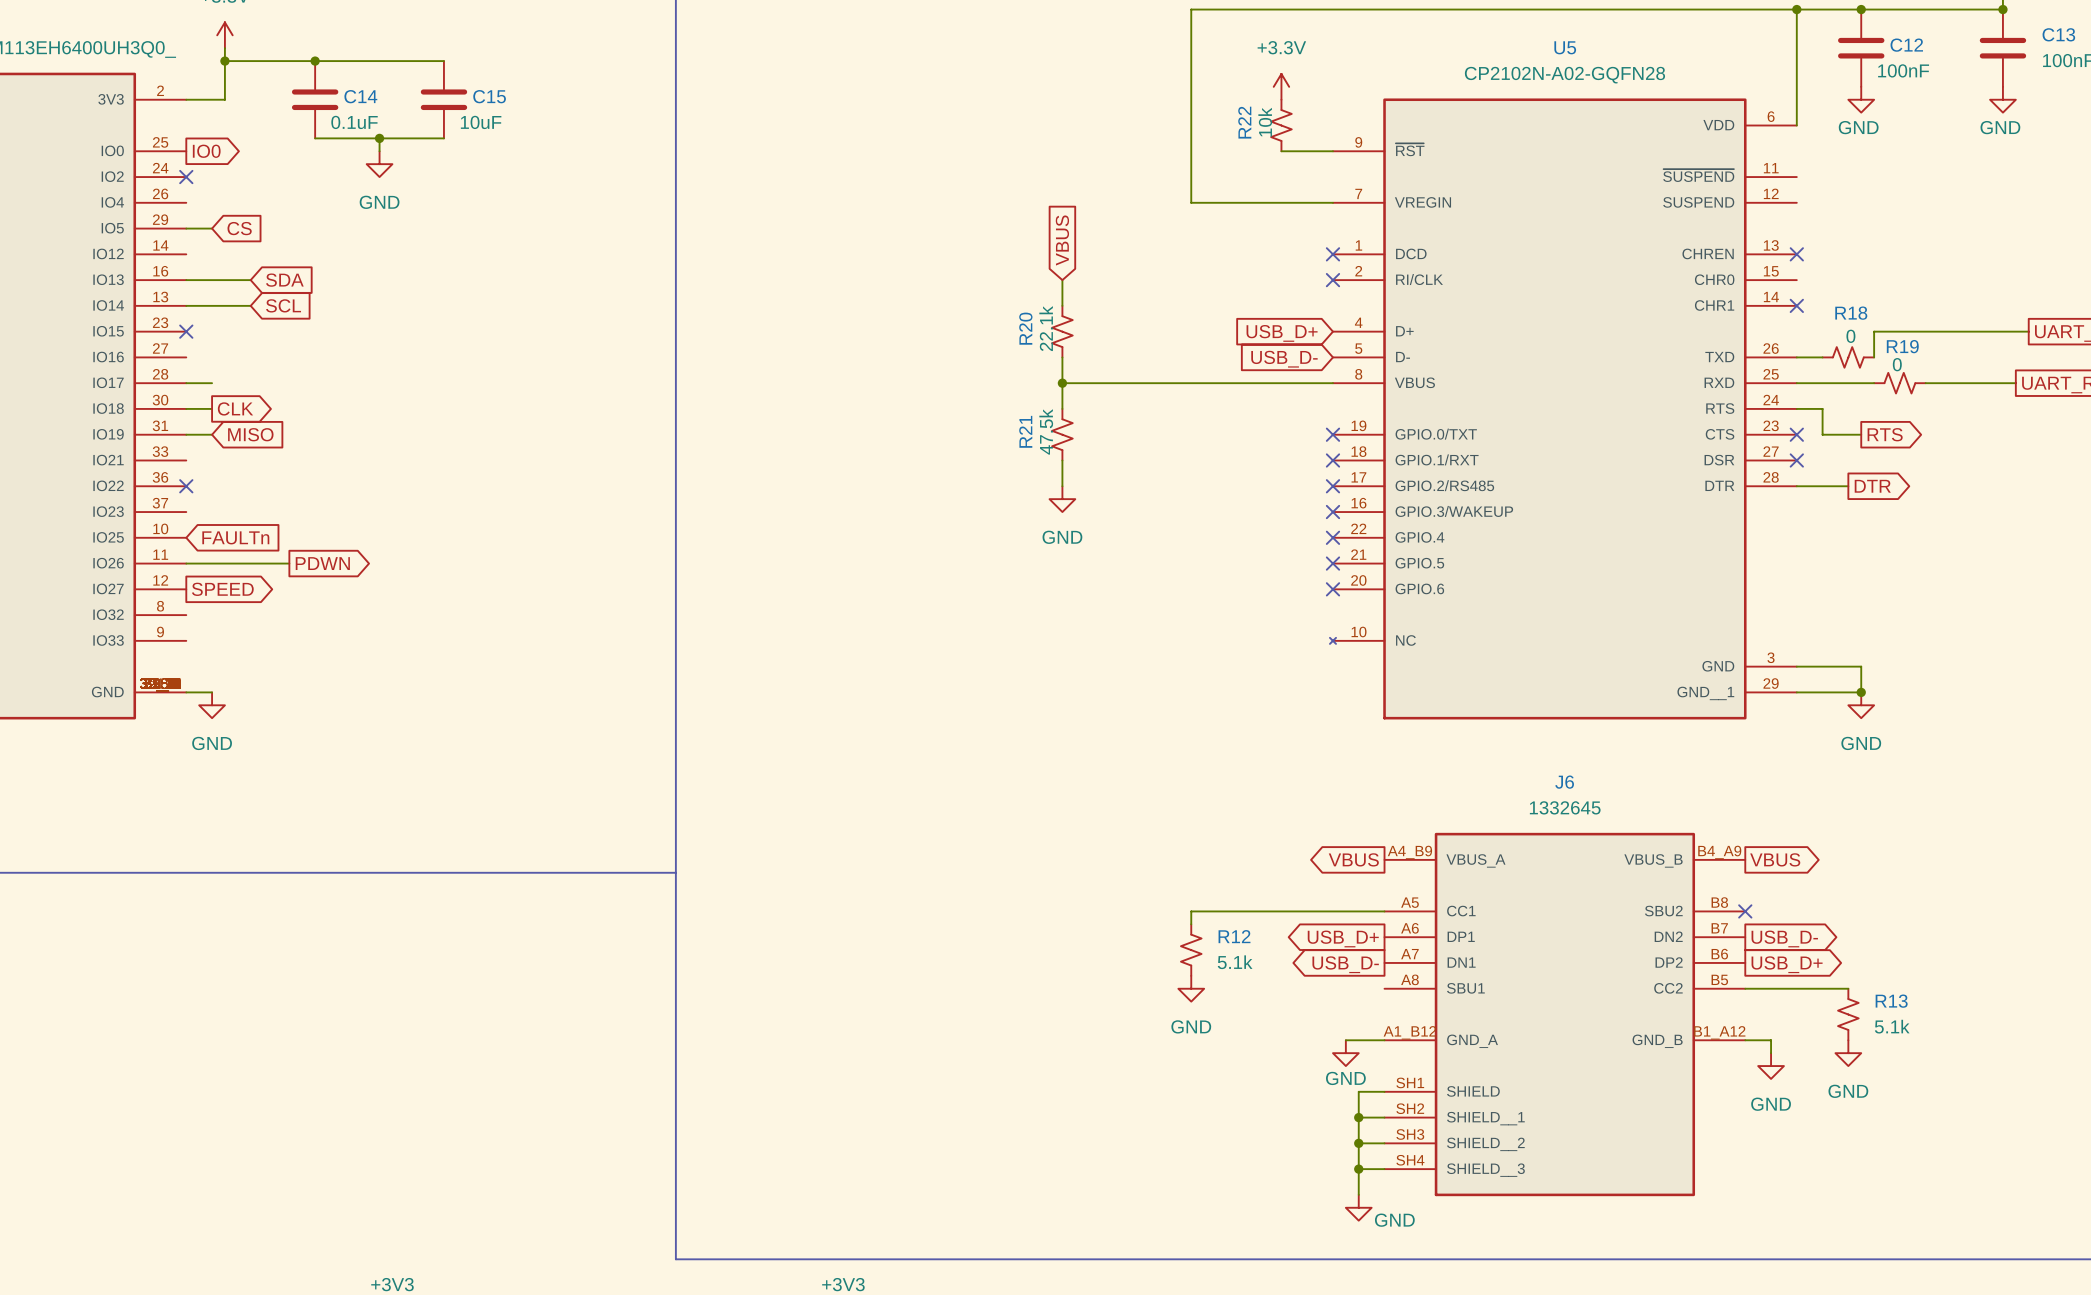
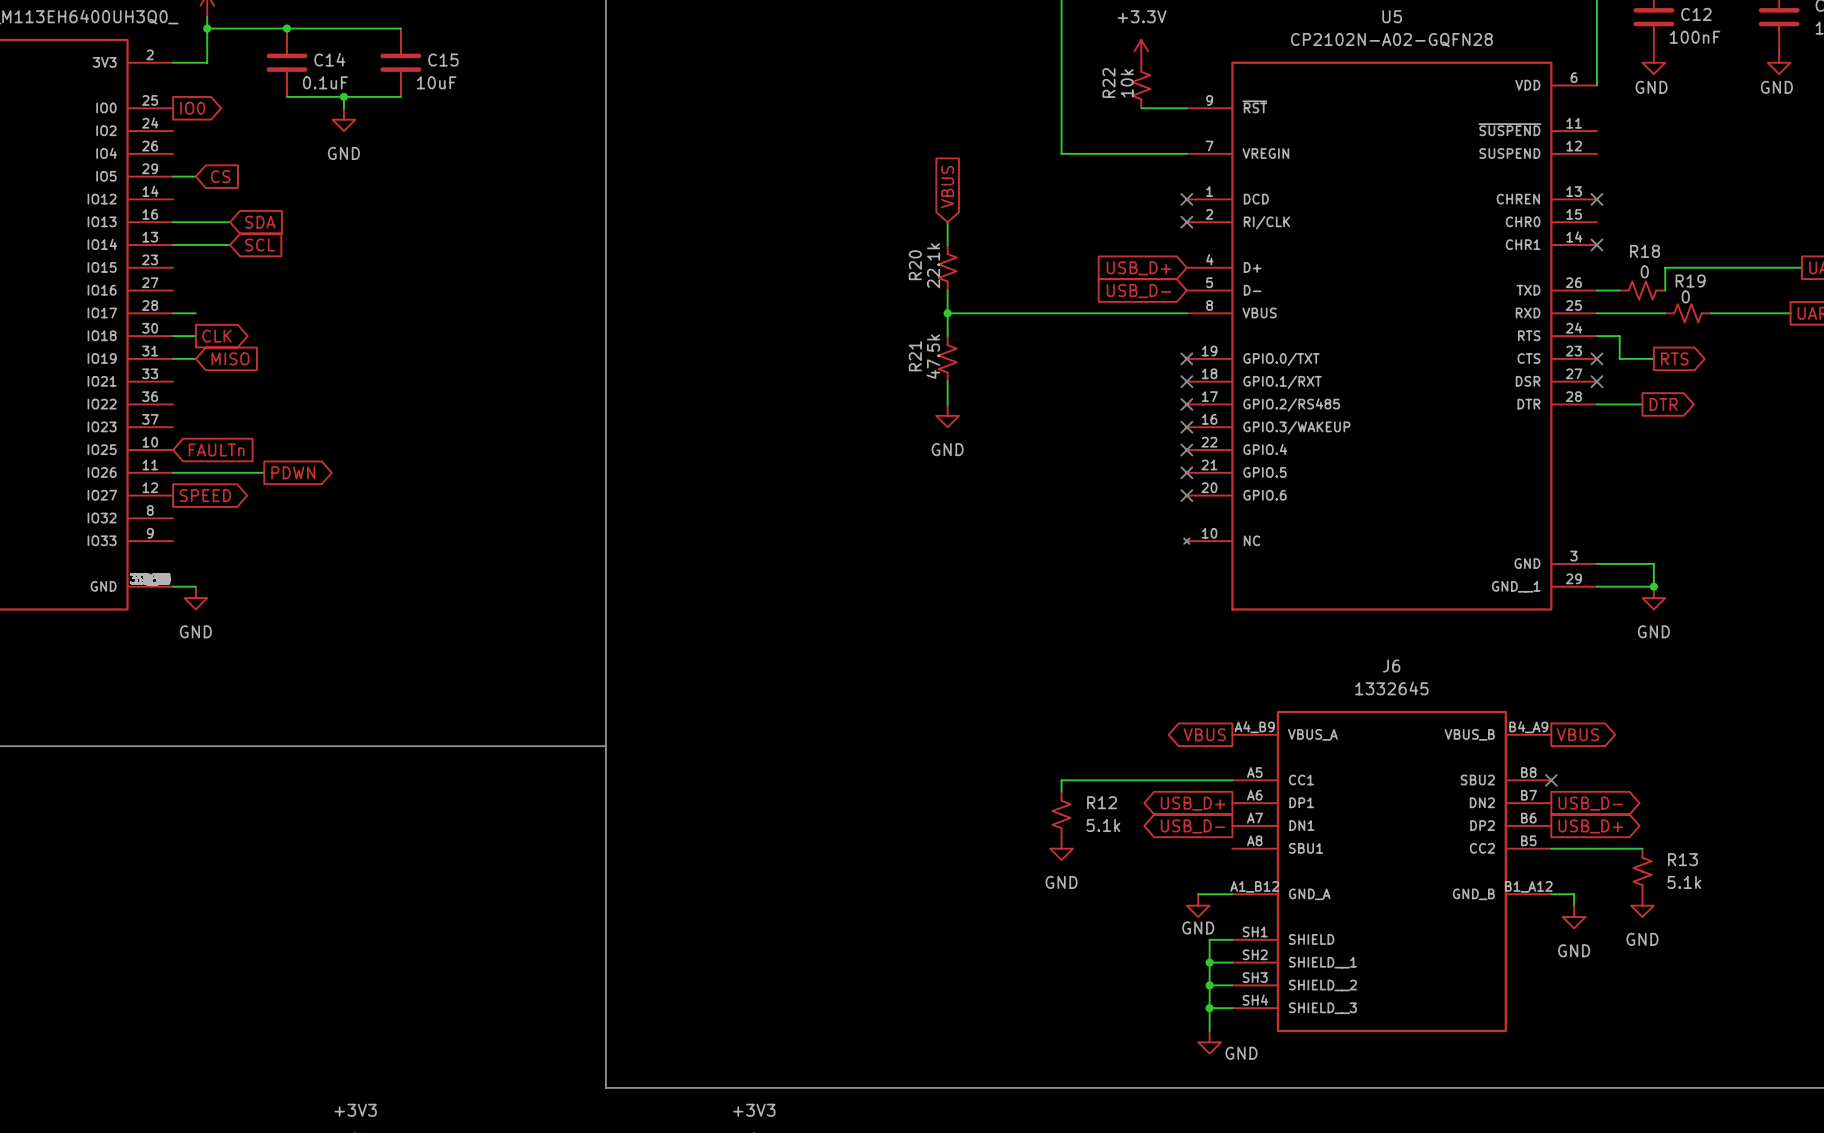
no-connect mark: (186, 177) -> none
no-connect mark: (186, 331) -> none
no-connect mark: (186, 486) -> none

